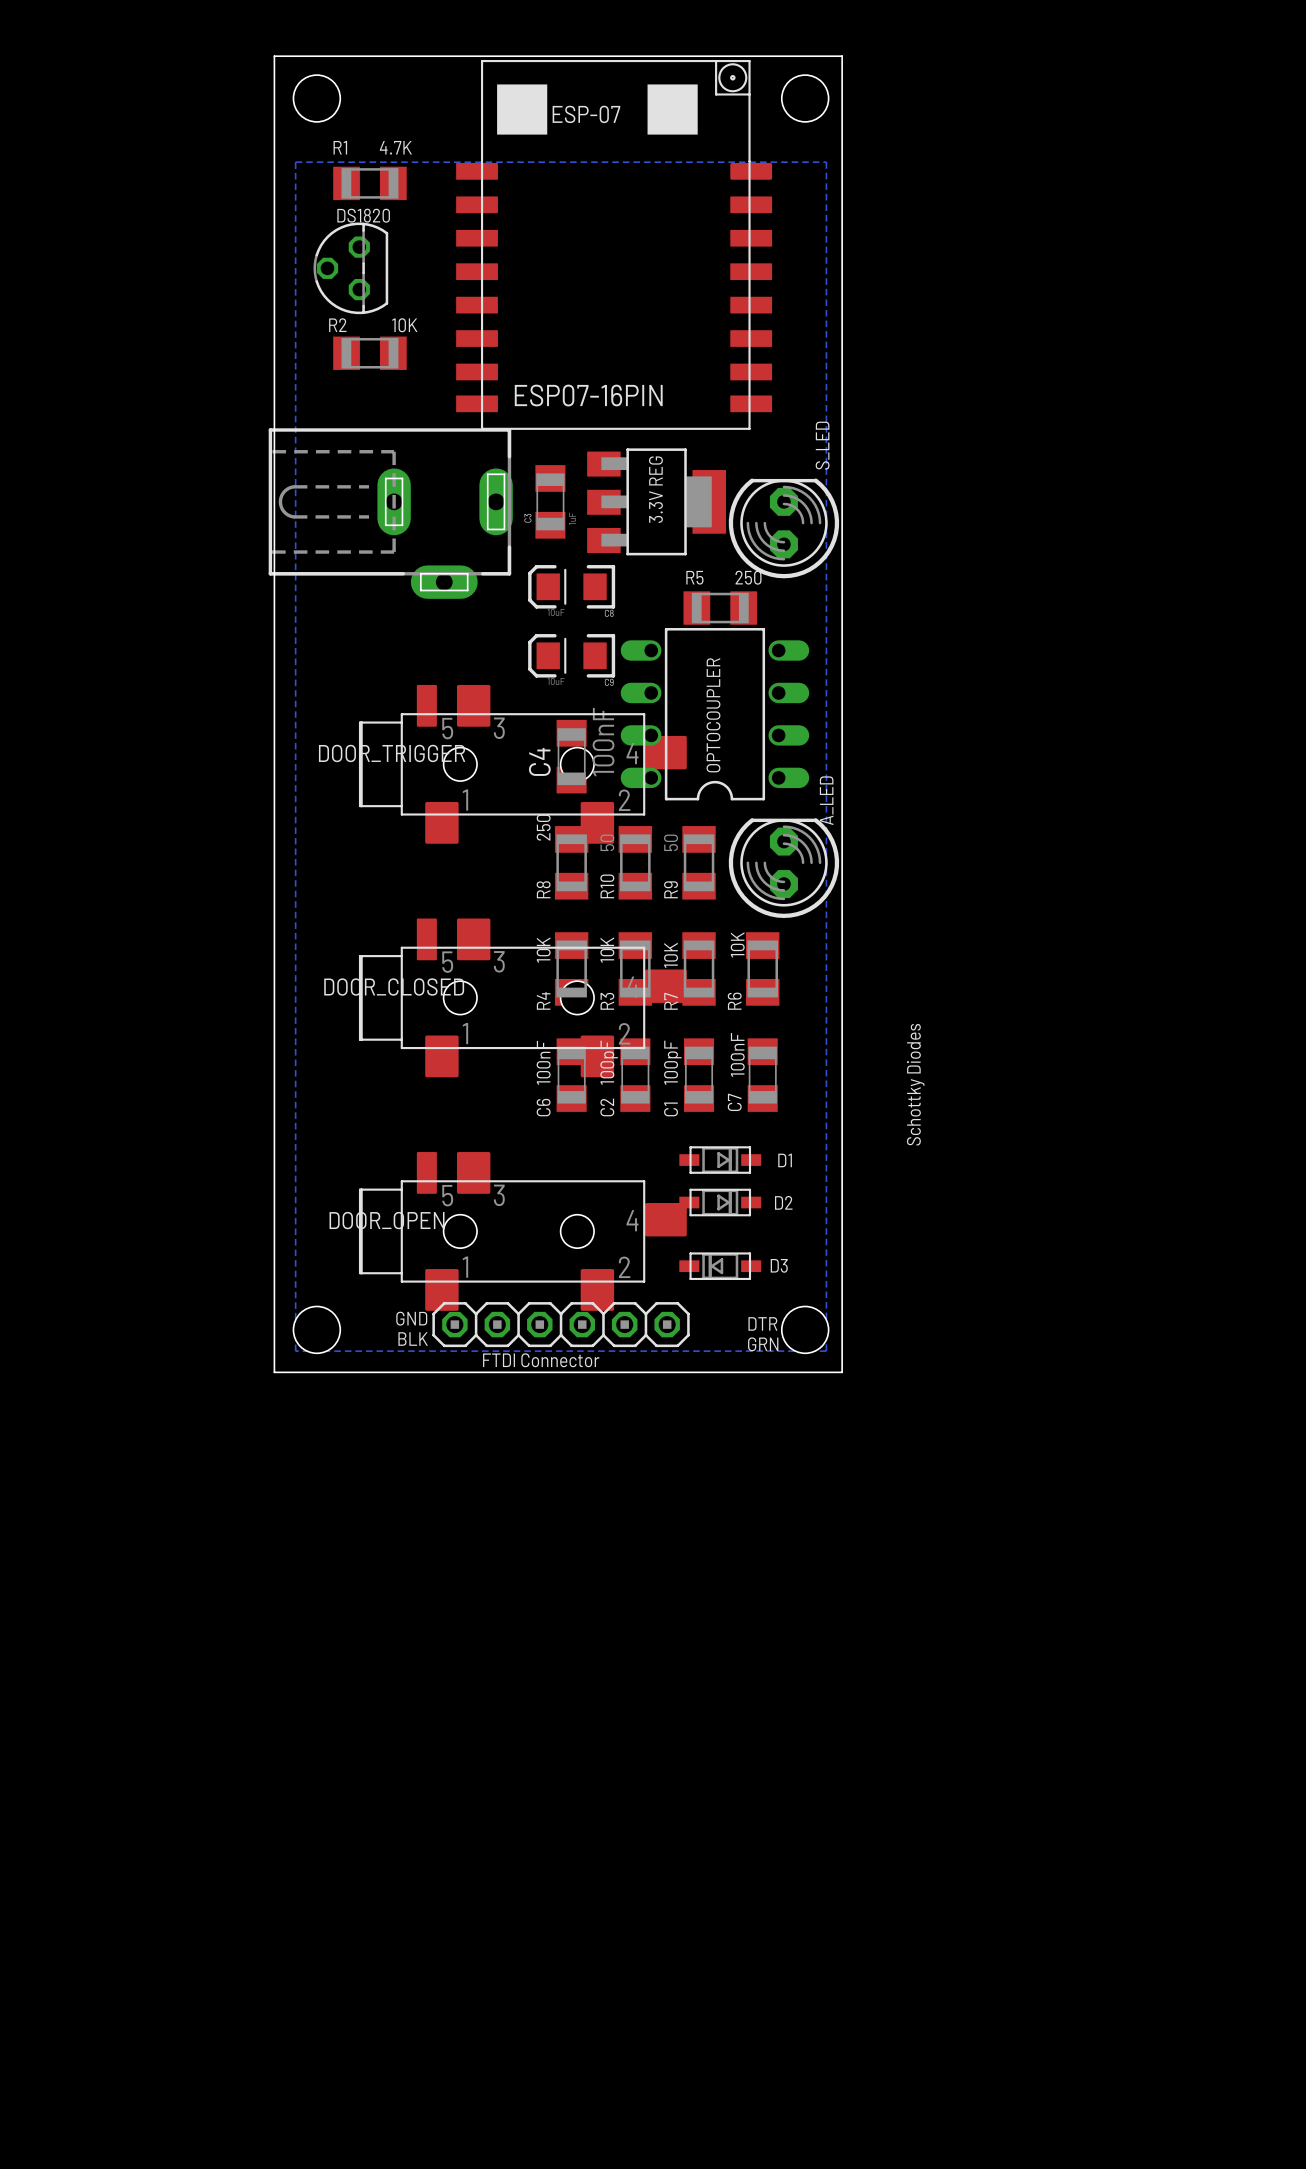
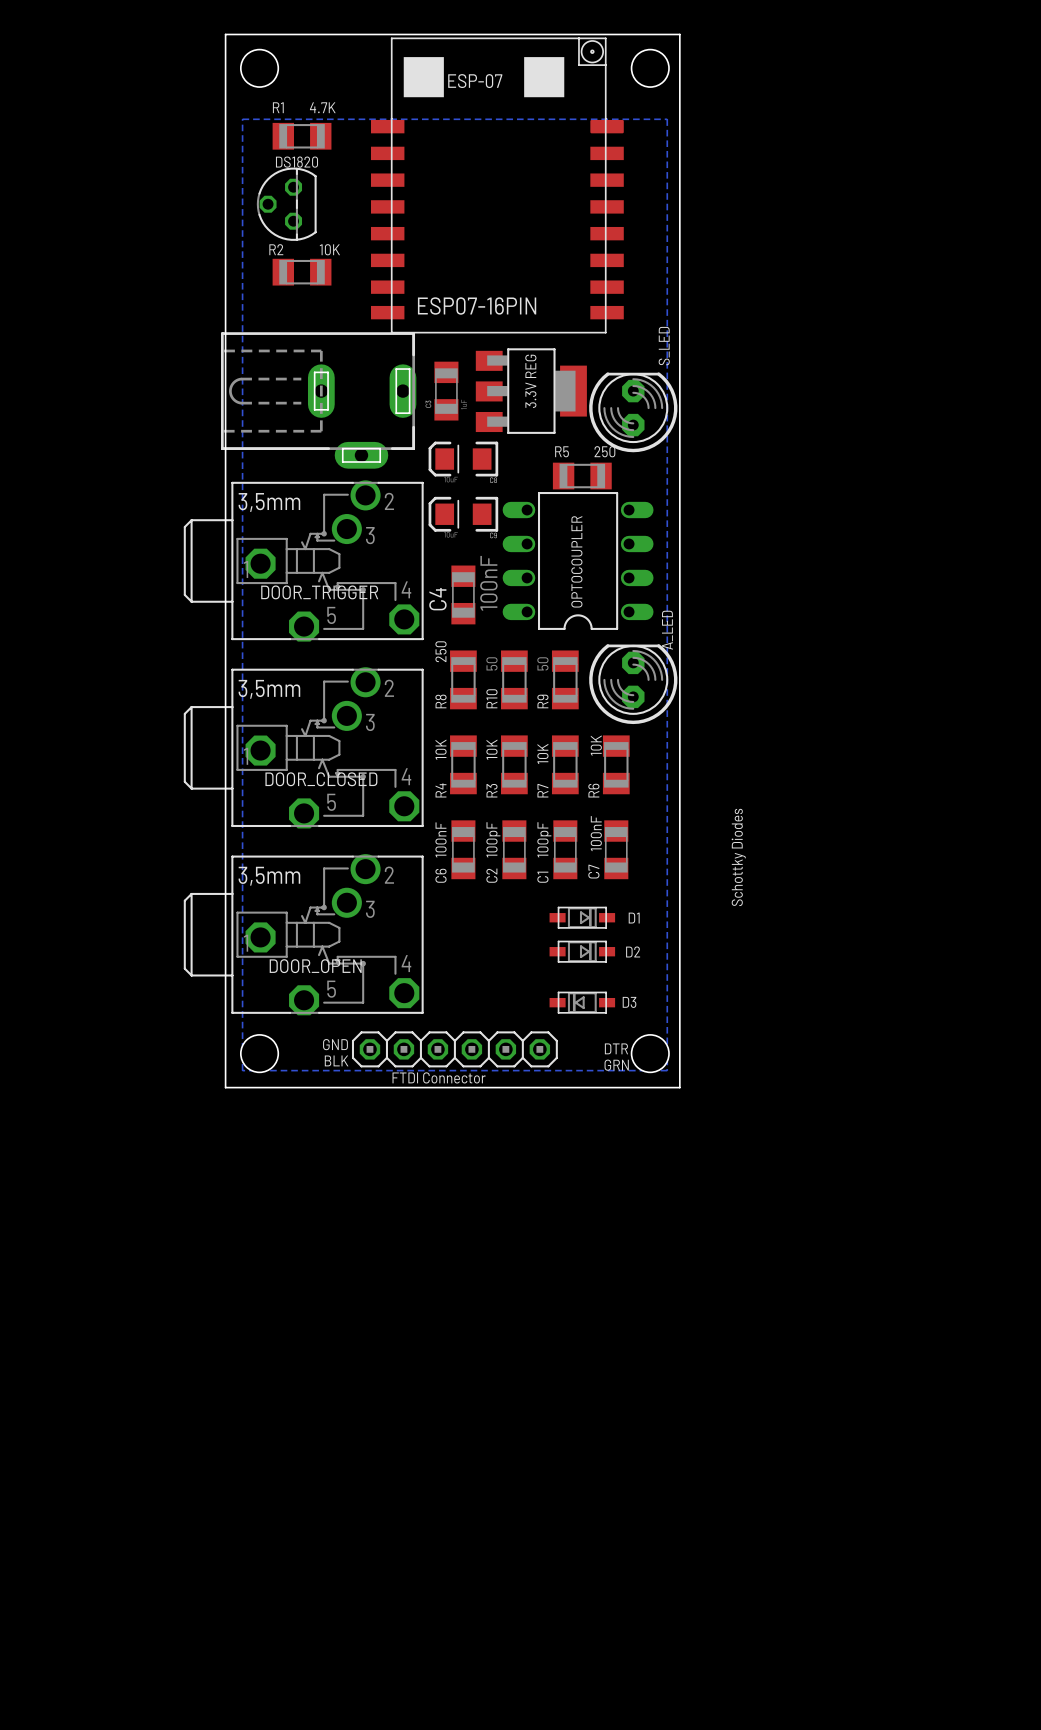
DOOR_TRIGGER: none -> (303, 560)
DOOR_TRIGGER: (522, 764) -> none
DOOR_CLOSED: none -> (303, 747)
DOOR_CLOSED: (522, 997) -> none
DOOR_OPEN: none -> (303, 934)
DOOR_OPEN: (522, 1231) -> none

